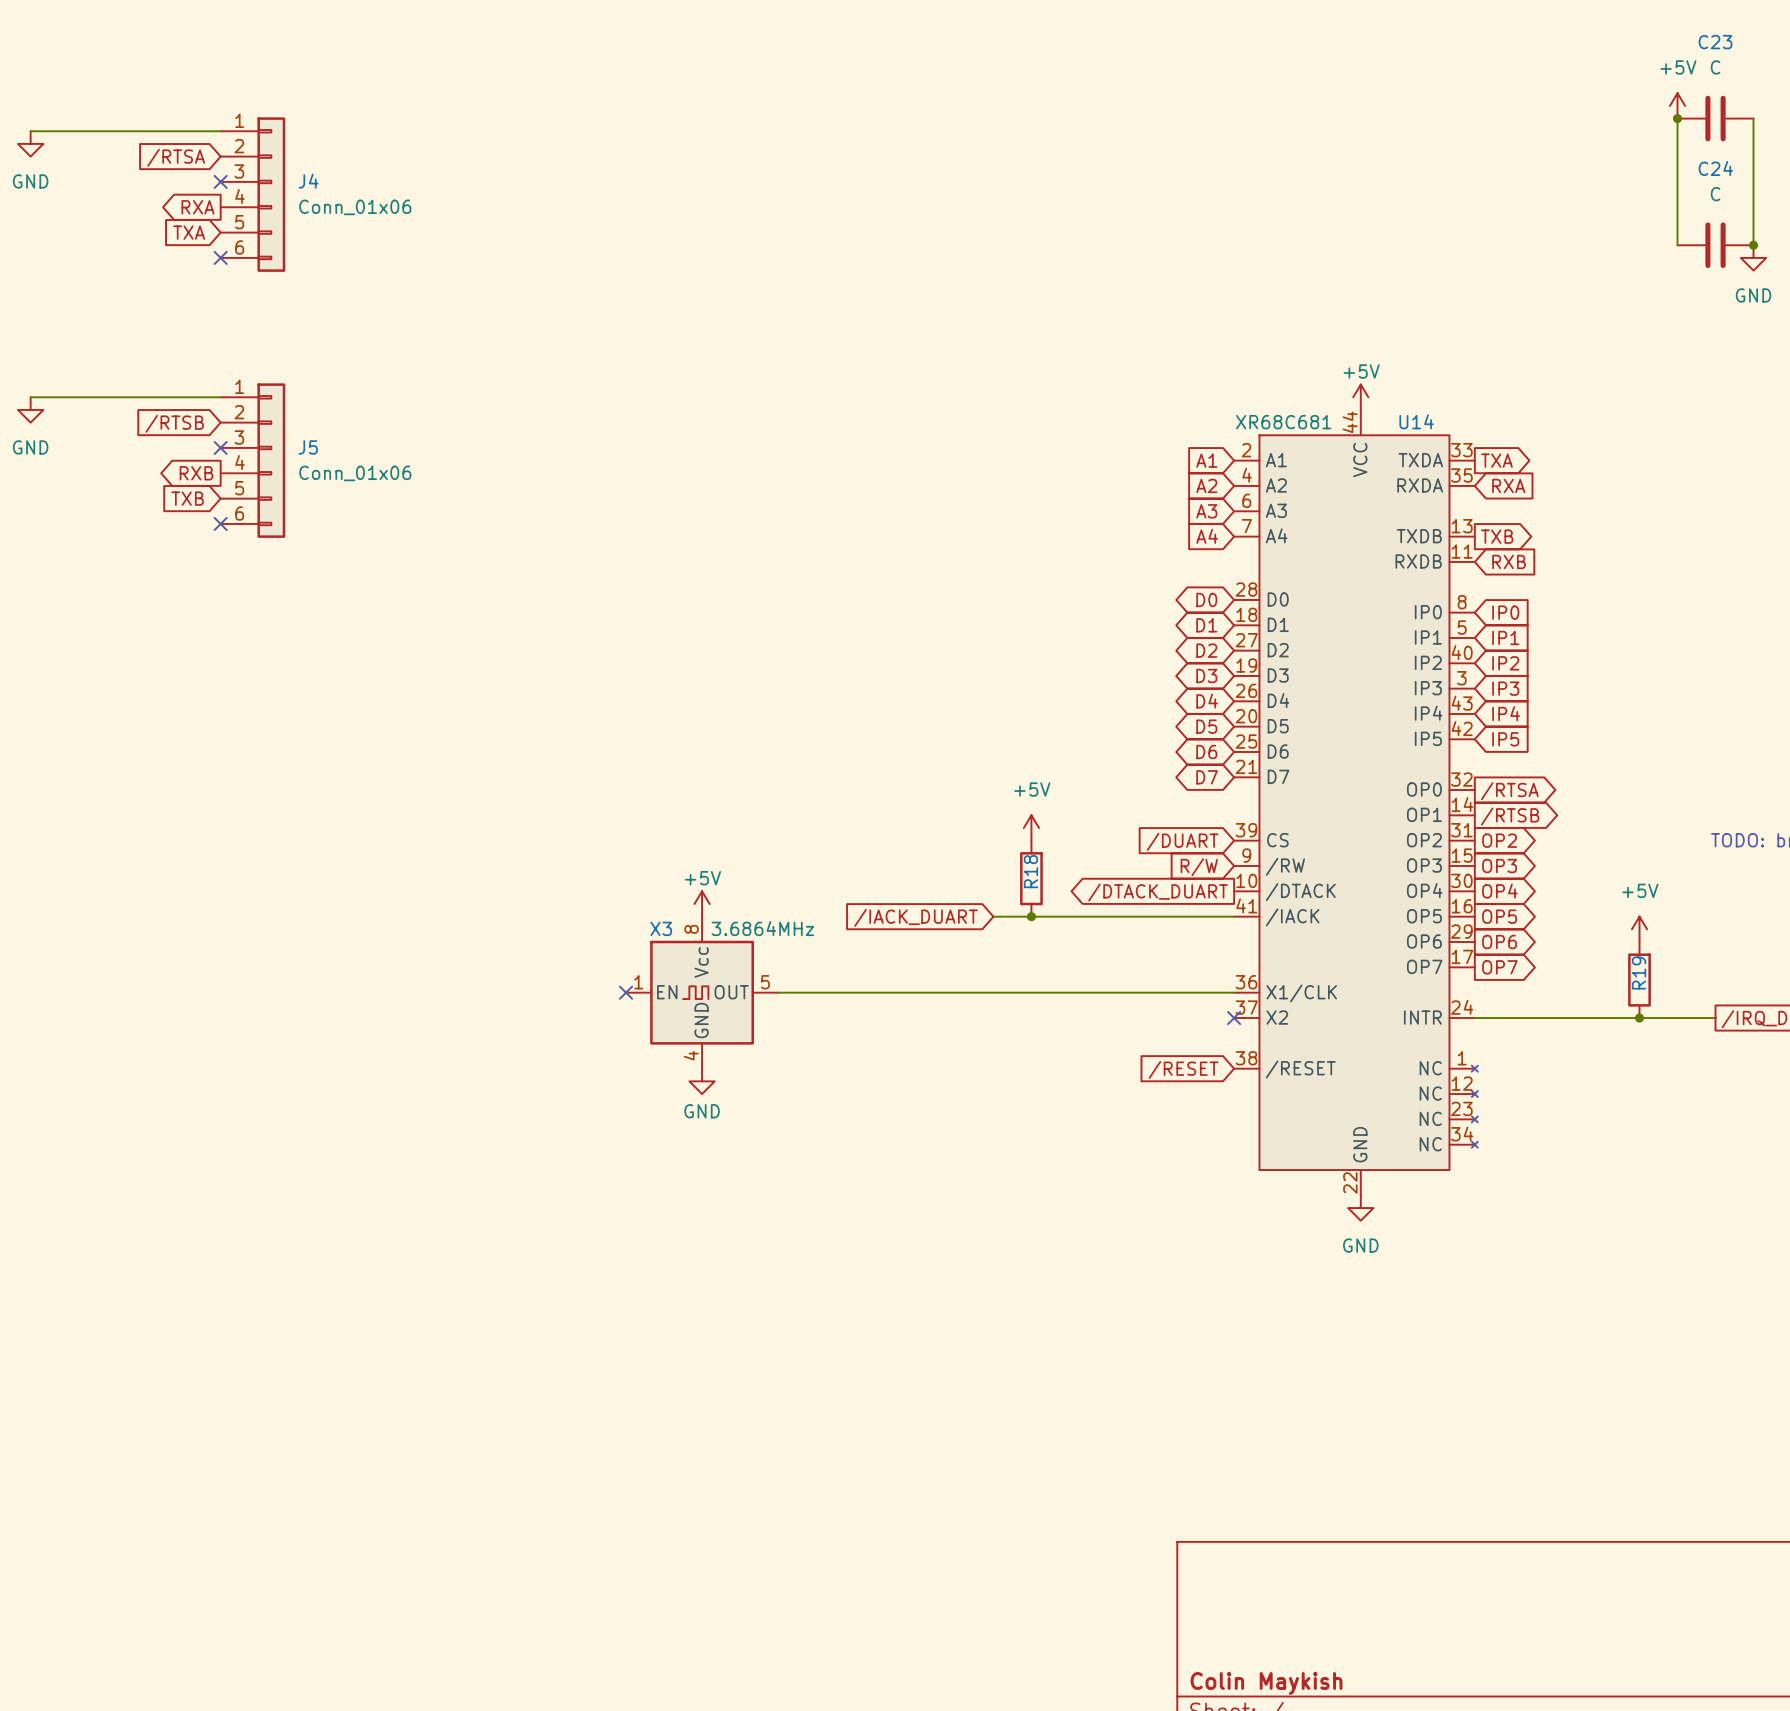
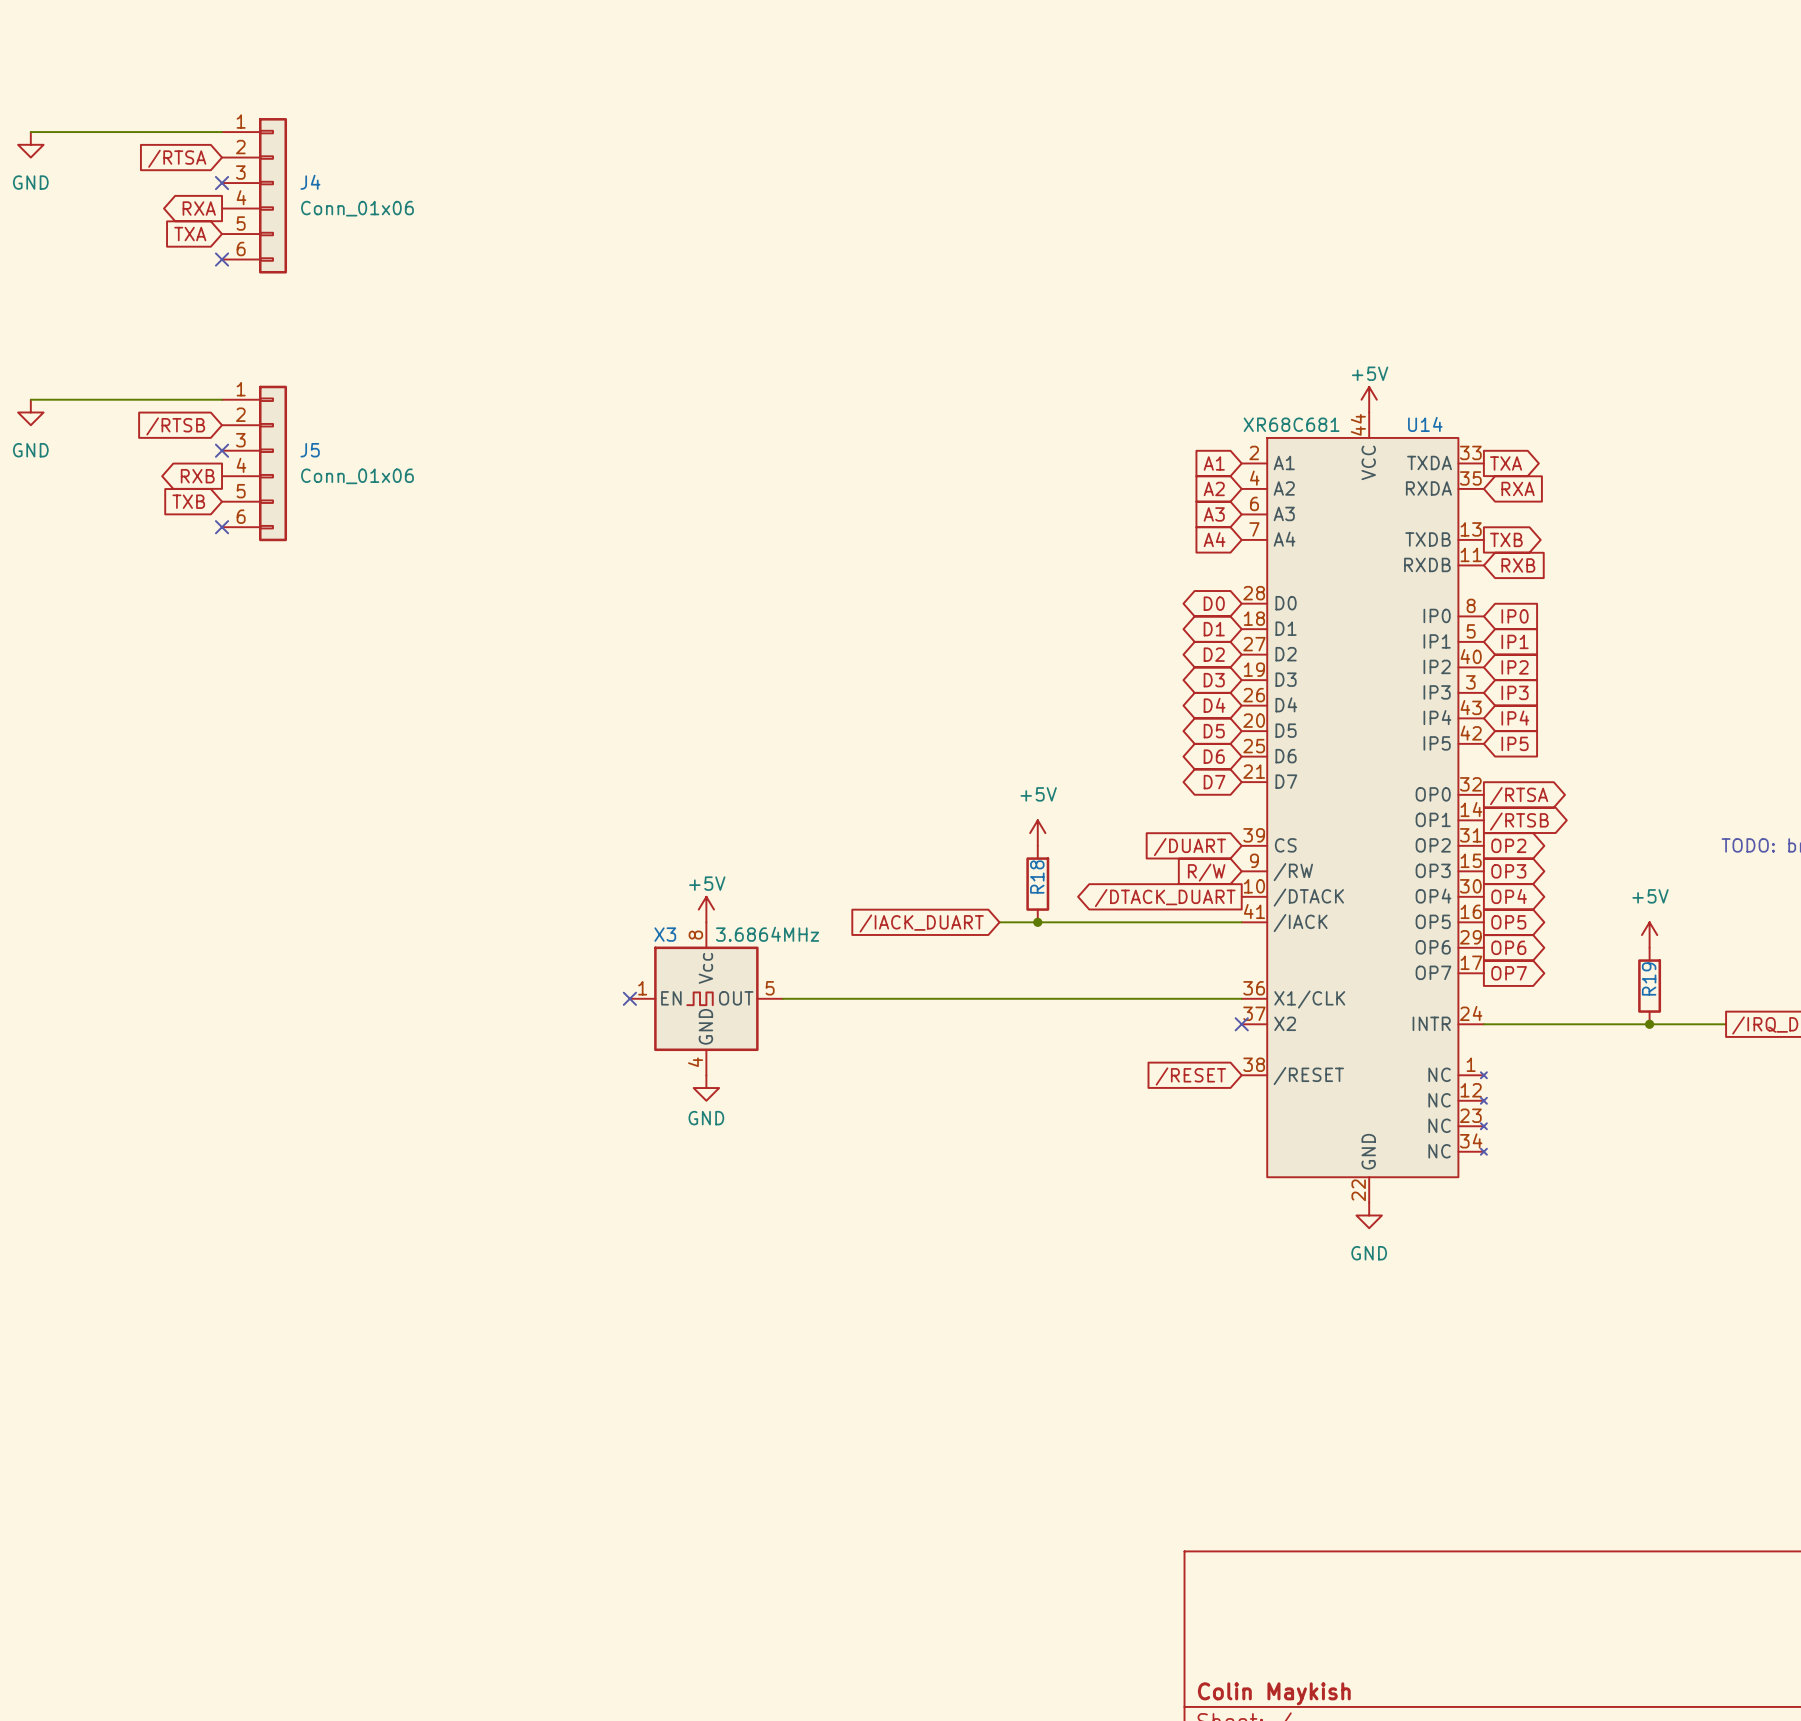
power symbol: +5V (1677, 105) -> none
wire: (1677, 118) (1677, 245) -> none
junction: (1677, 118) -> none
C23: C (1715, 118) -> none
wire: (1753, 118) (1753, 245) -> none
C24: C (1715, 245) -> none
junction: (1753, 245) -> none
power symbol: GND (1753, 257) -> none

